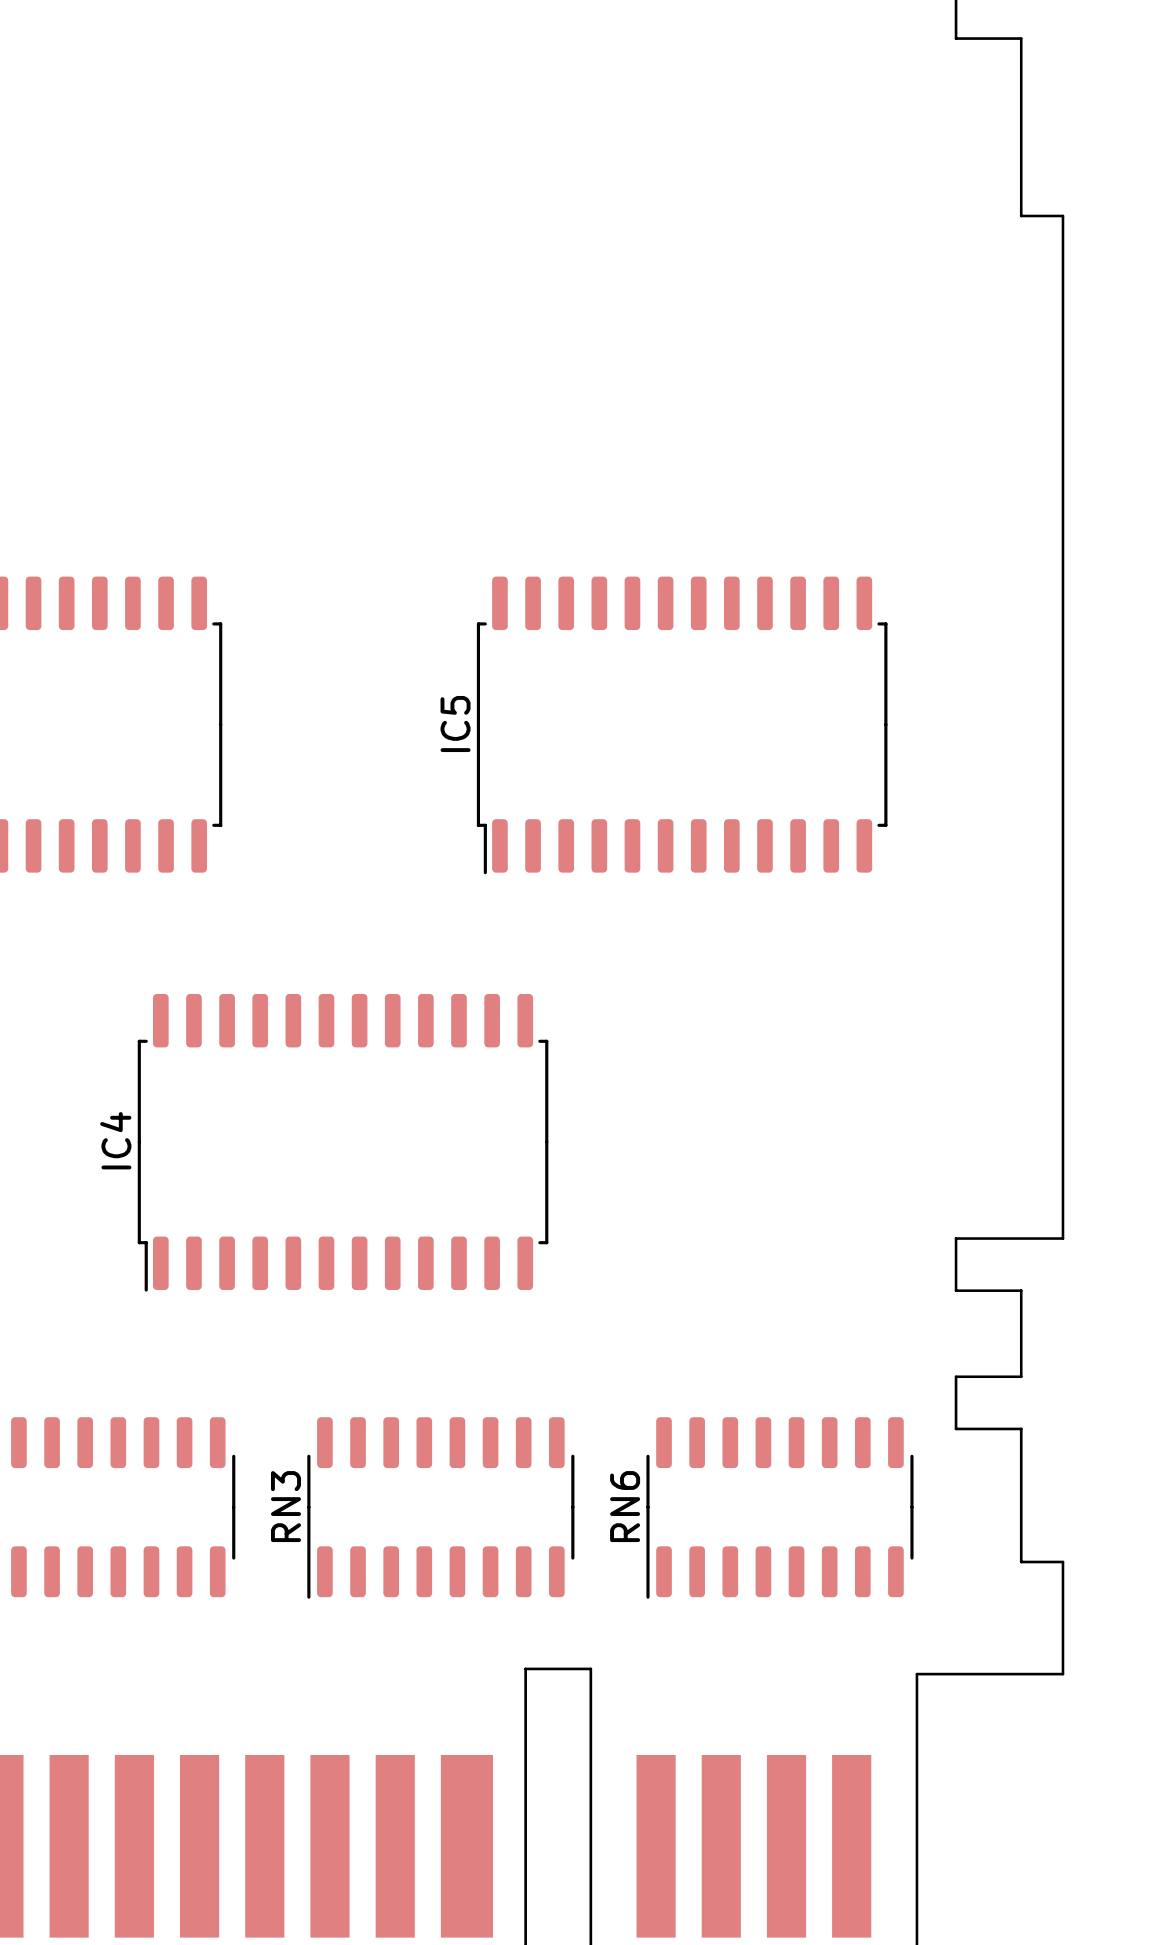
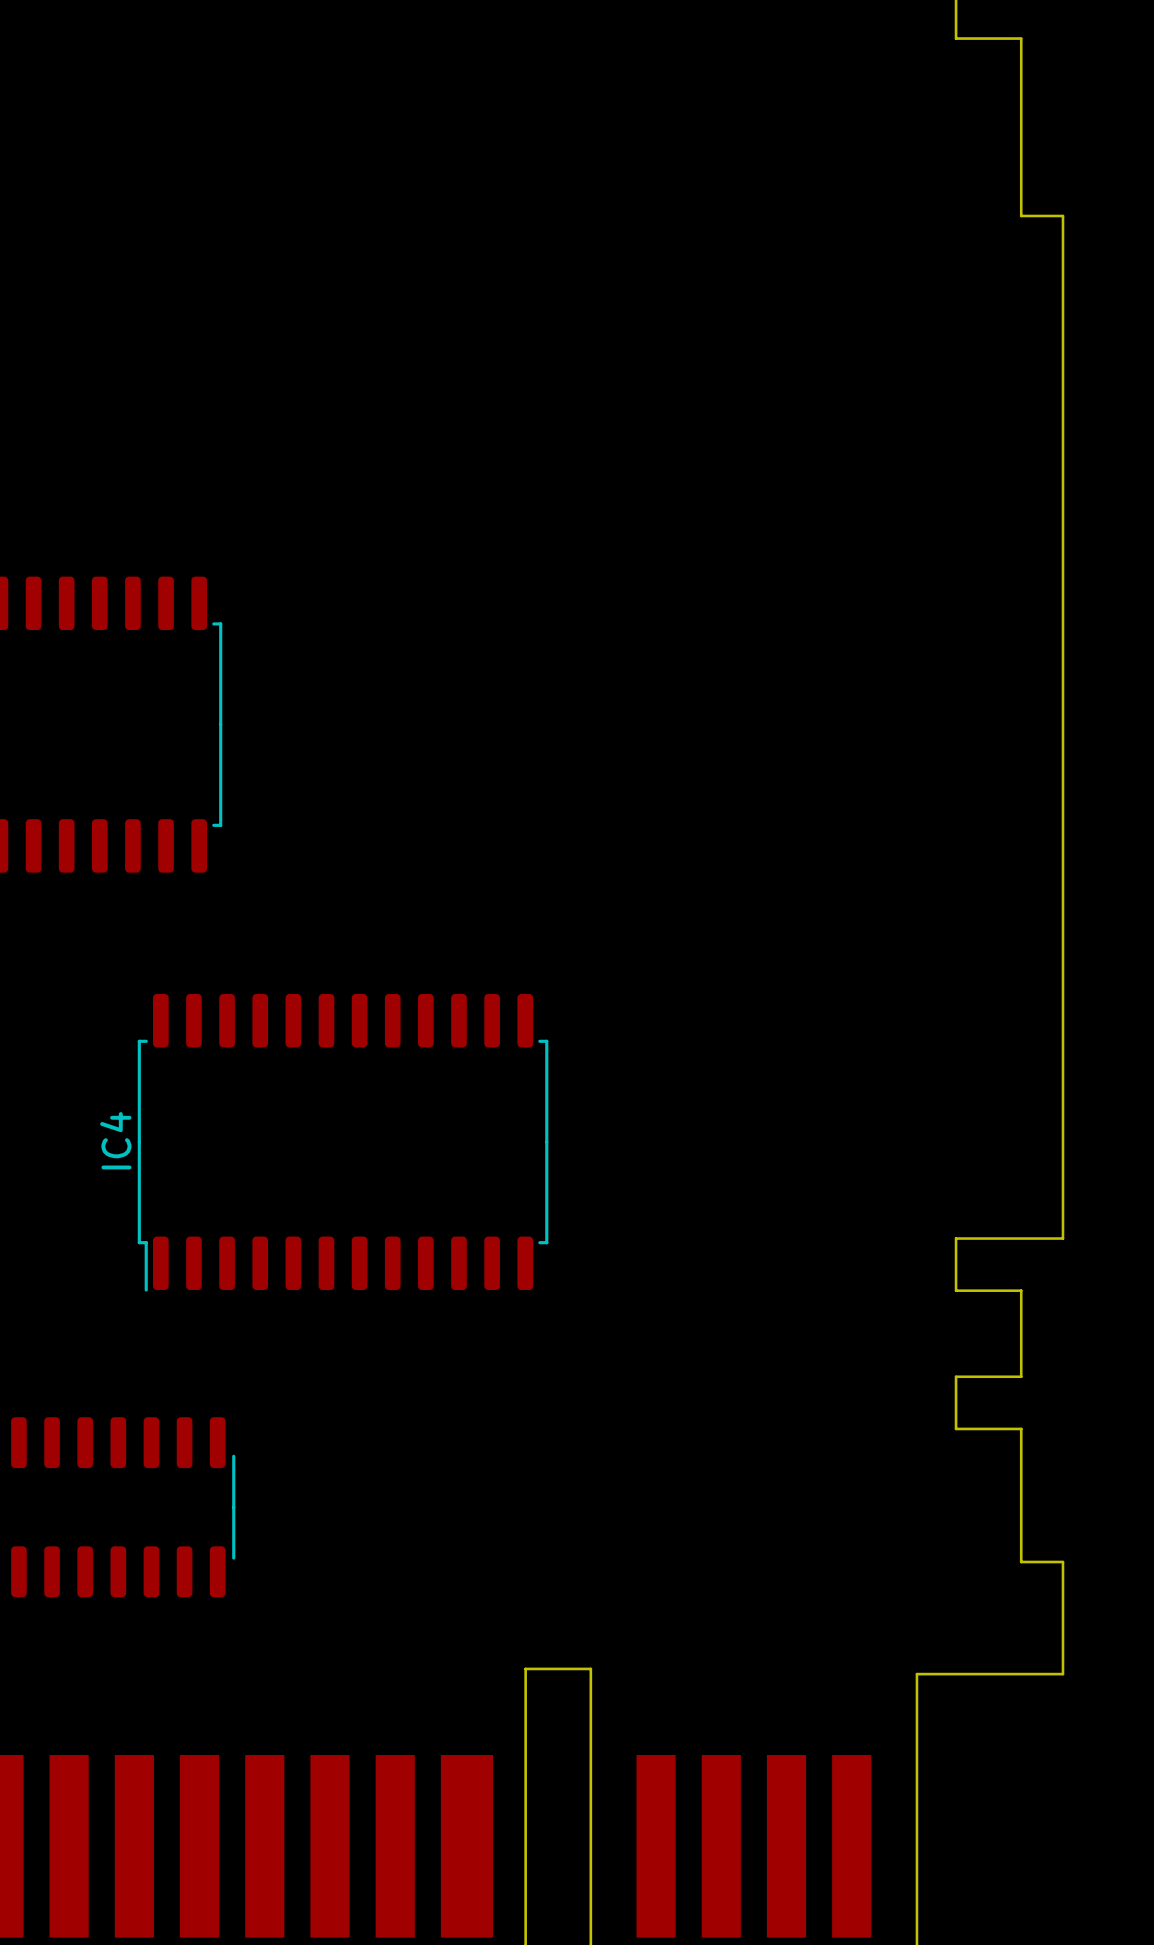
IC5: (682, 725) -> none
RN3: (440, 1507) -> none
RN6: (779, 1507) -> none

